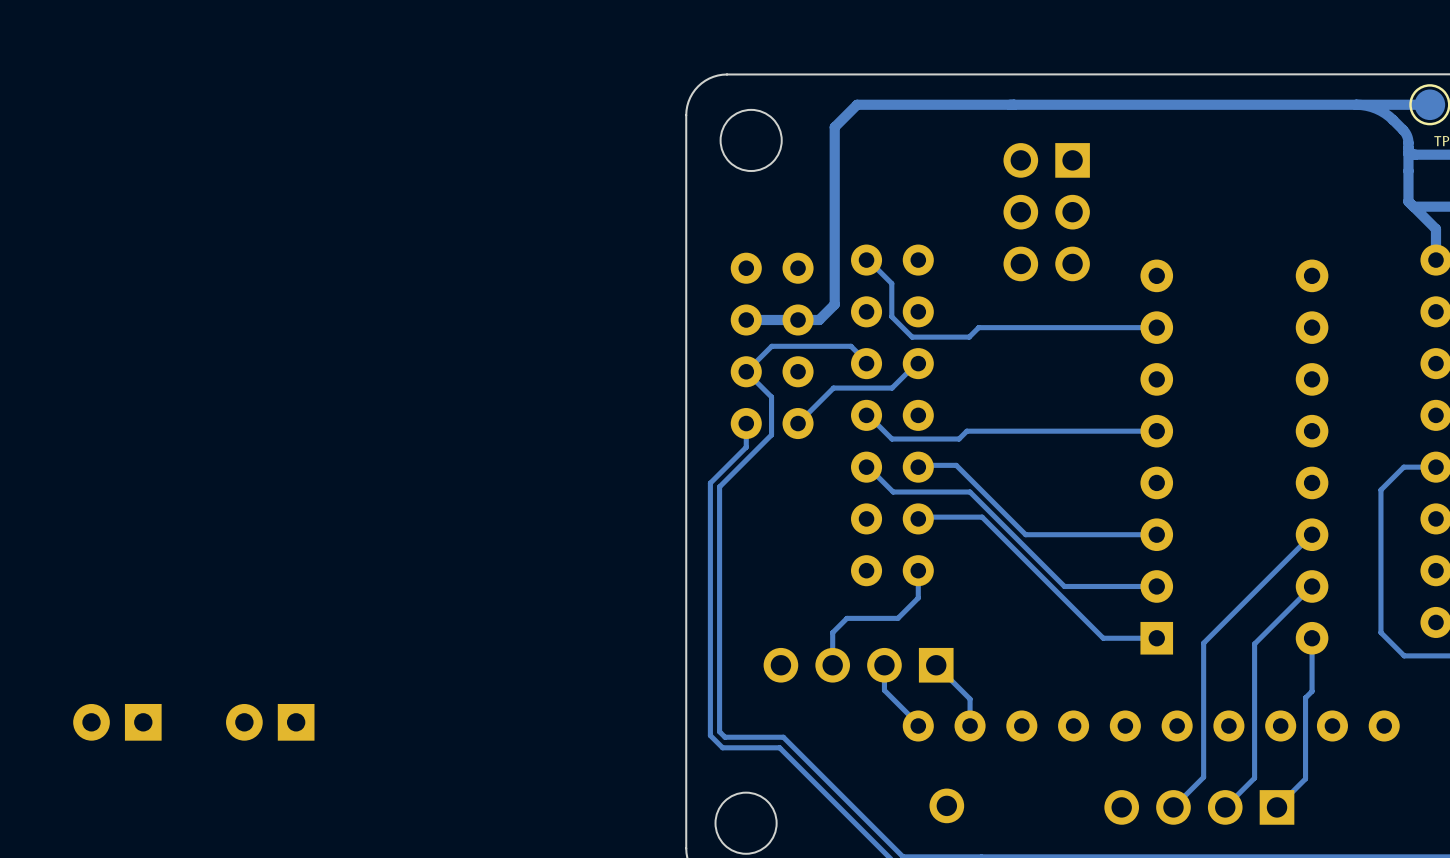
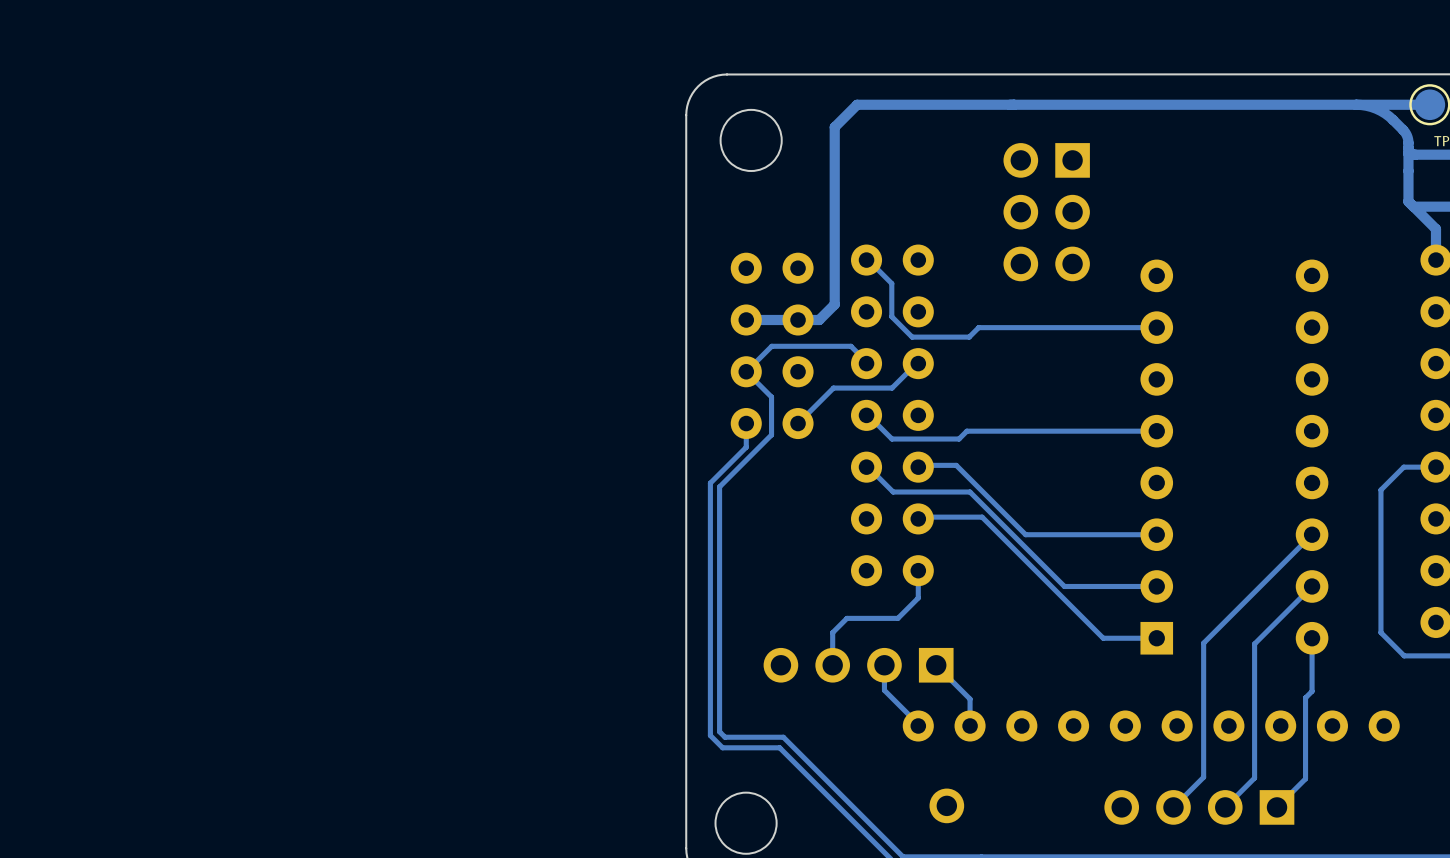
part: (117, 722) -> none
part: (270, 722) -> none

